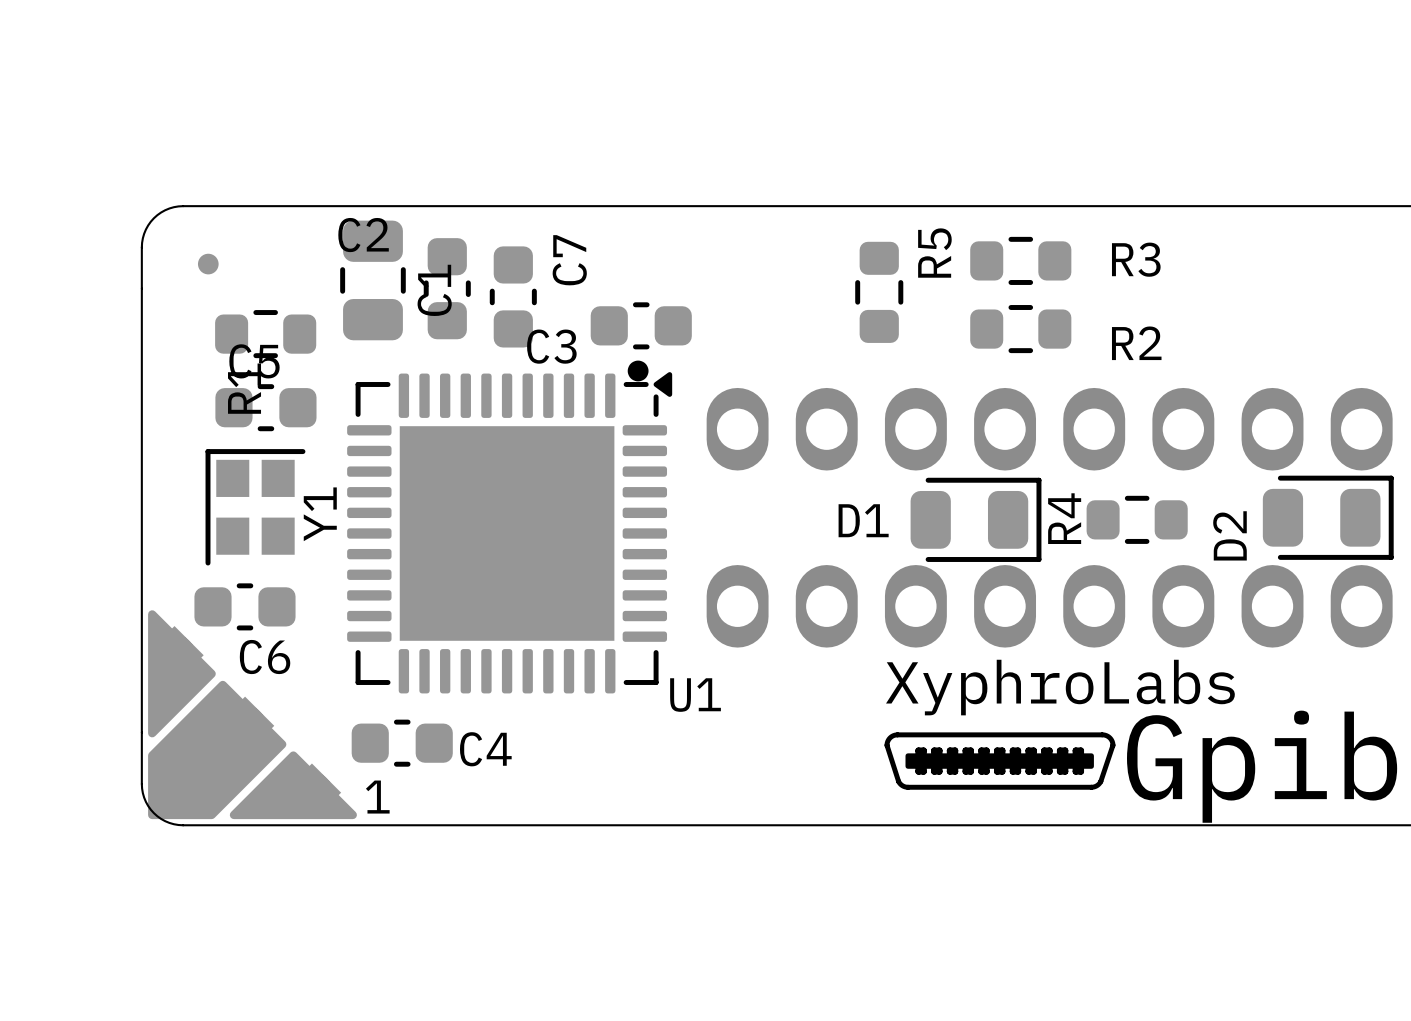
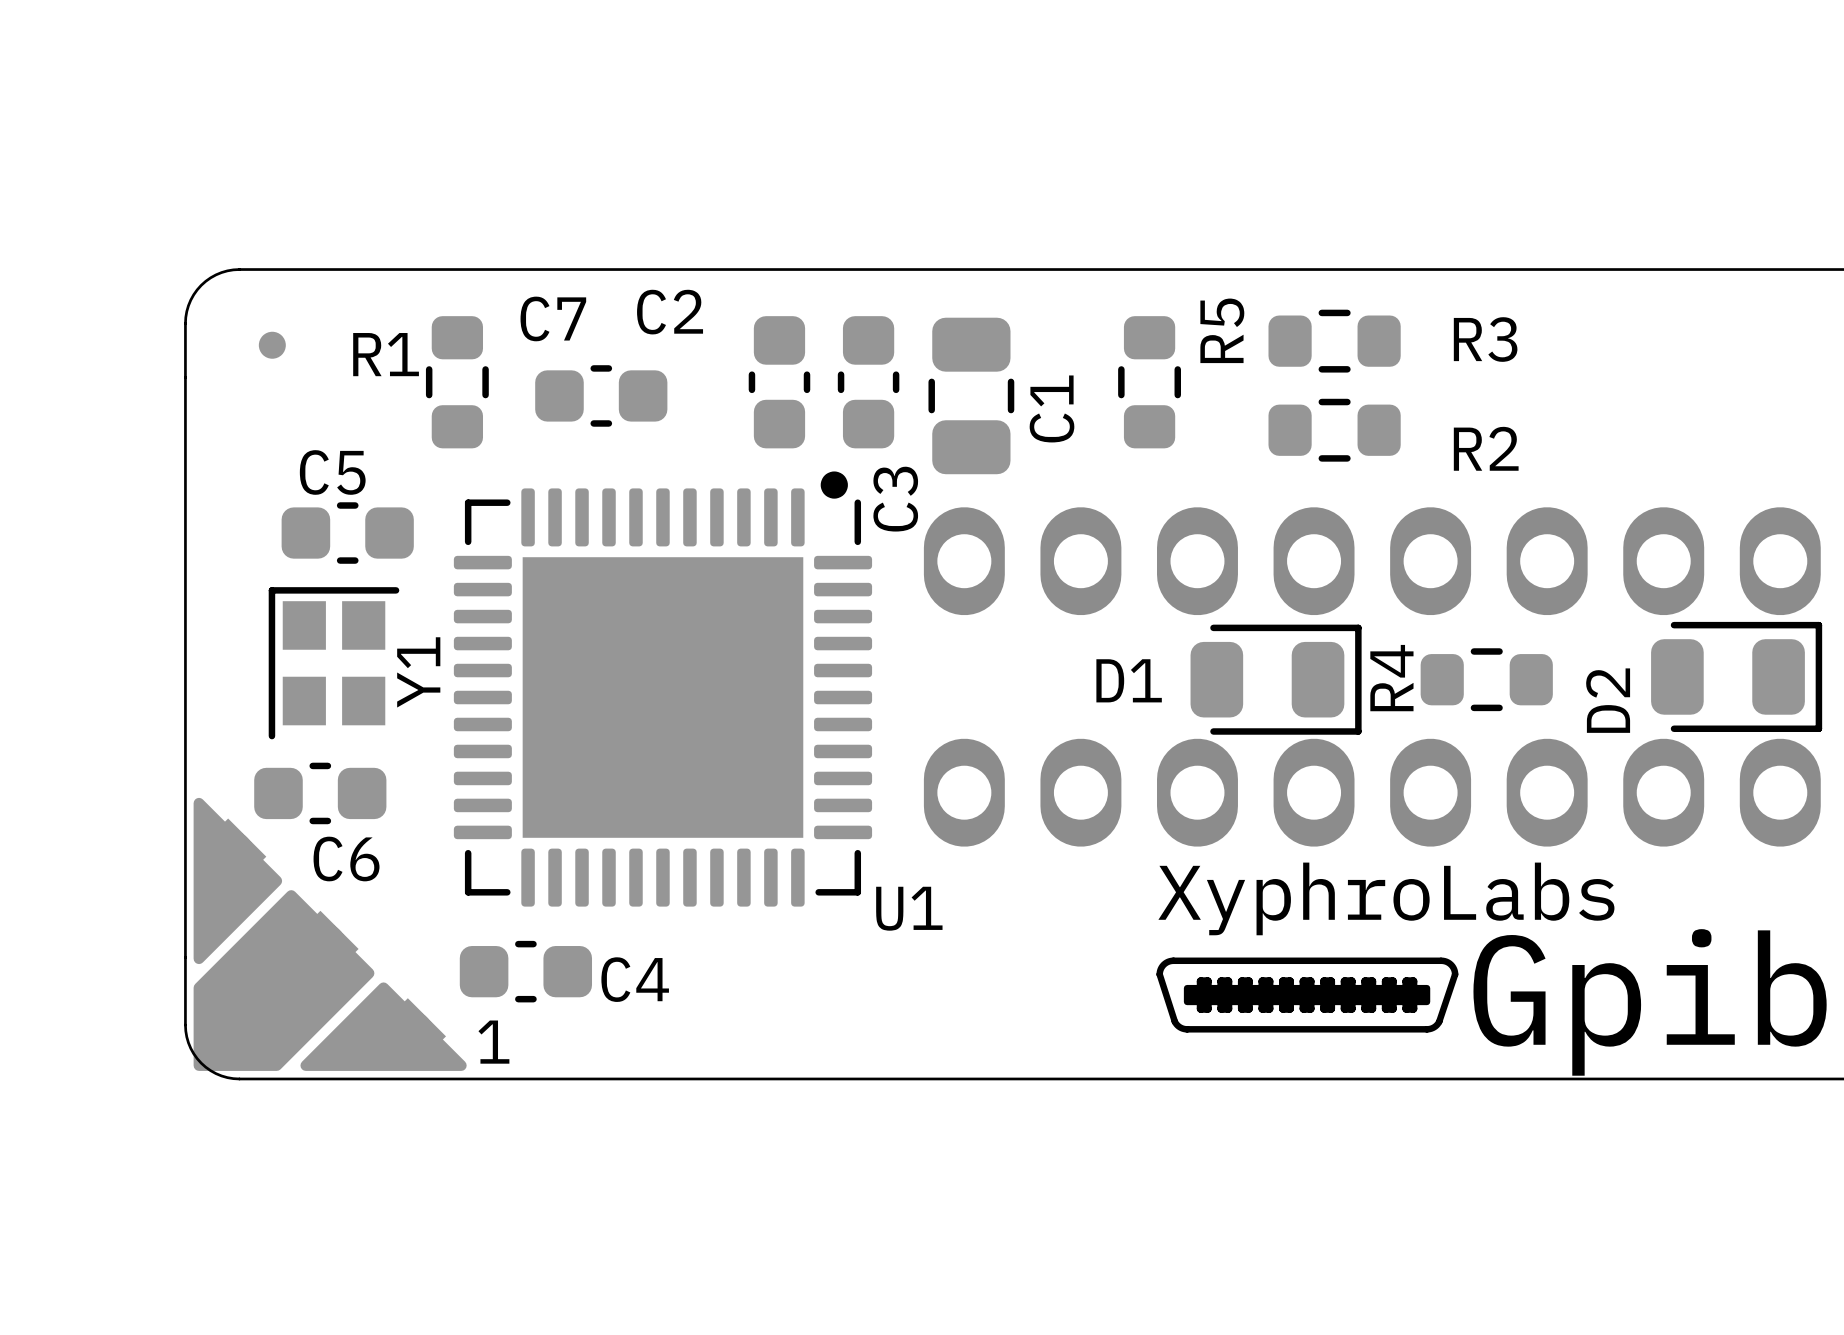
C7 name position: C7 (569, 260) -> C7 (553, 318)
C1 position: (372, 280) -> (971, 395)
C2 position: (447, 288) -> (779, 382)
C7 rotation: 0° (513, 296) -> 90° clockwise (601, 395)
C3 rotation: 0° (641, 325) -> 90° clockwise (868, 382)
R1 rotation: 0° (265, 334) -> 90° clockwise (457, 382)
R1 position: (265, 334) -> (457, 382)
C3 name position: C3 (551, 346) -> C3 (895, 499)
U1 footprint: [347, 372, 673, 694] -> [453, 488, 873, 907]

